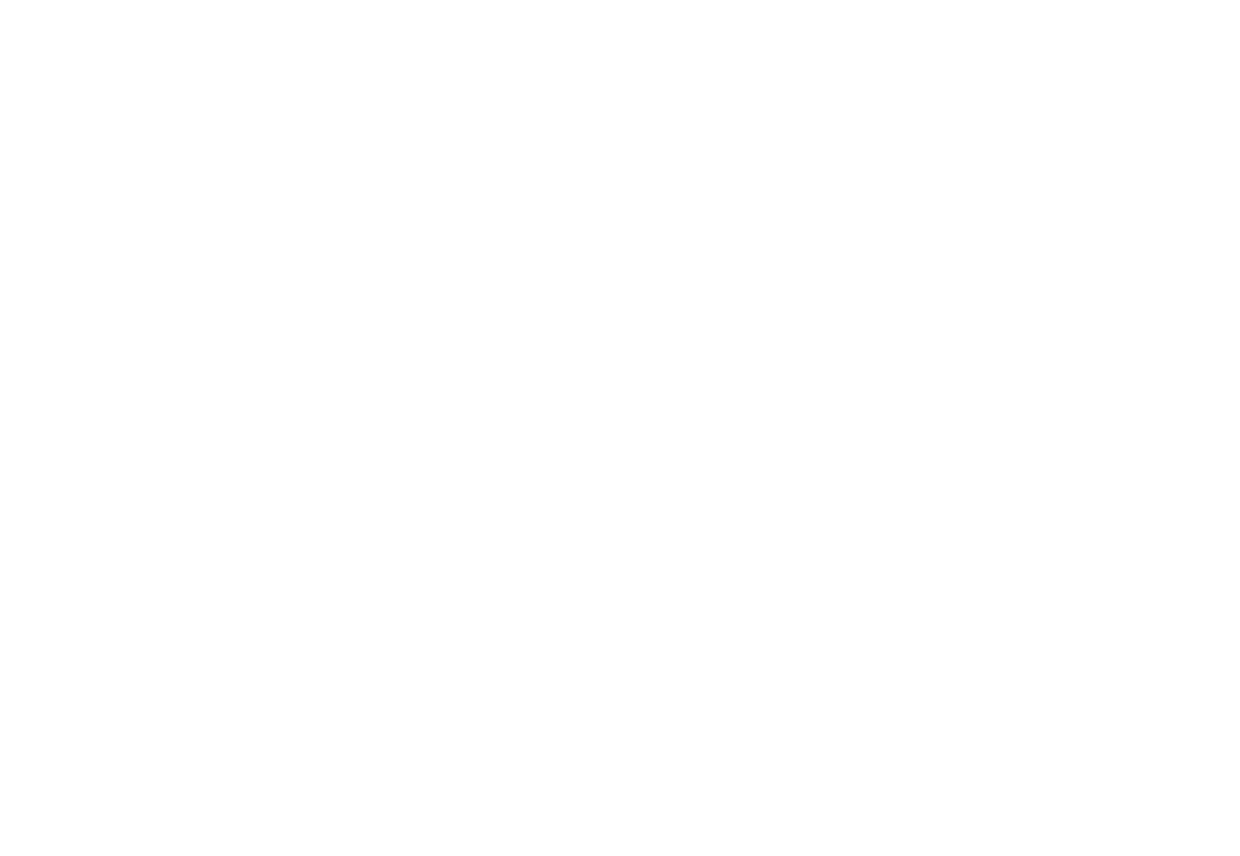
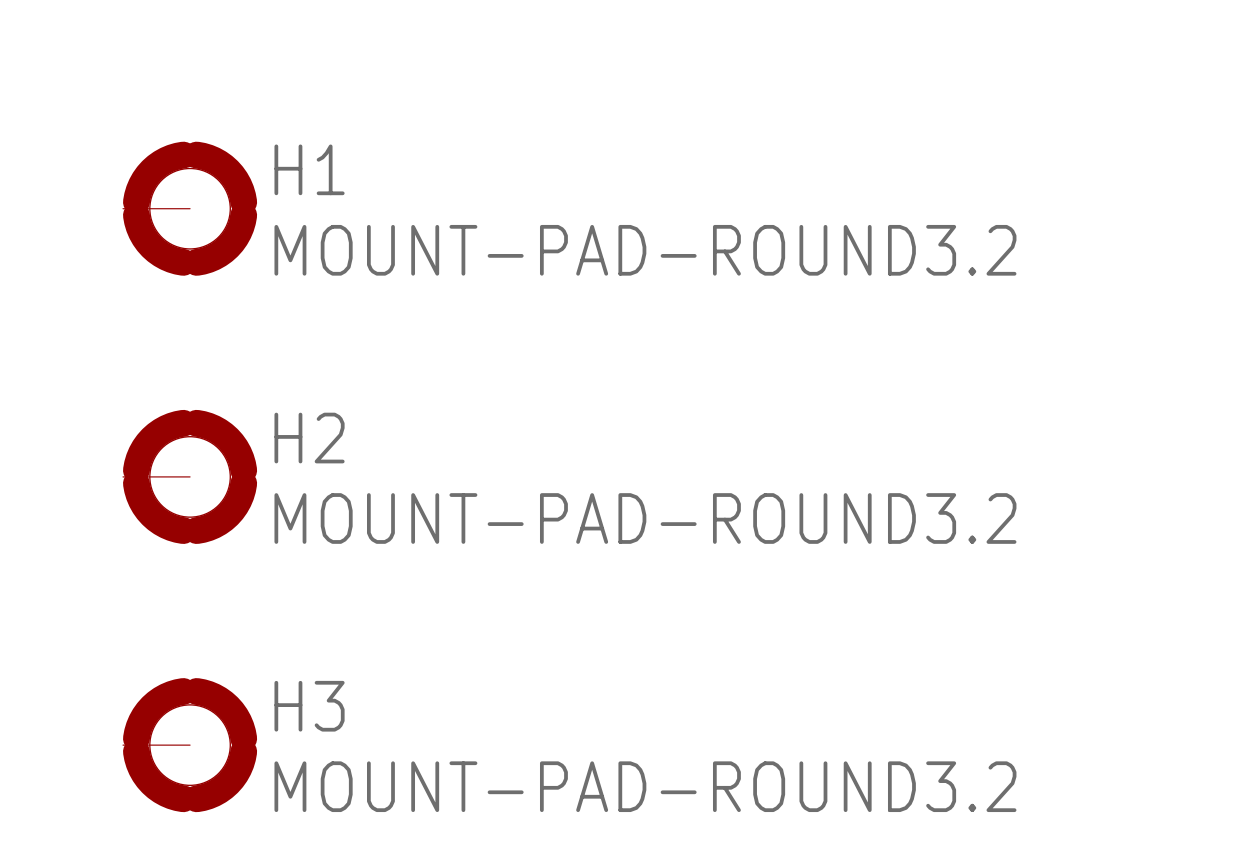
H1: none -> MOUNT-PAD-ROUND3.2 (190, 208)
H2: none -> MOUNT-PAD-ROUND3.2 (190, 476)
H3: none -> MOUNT-PAD-ROUND3.2 (190, 745)

